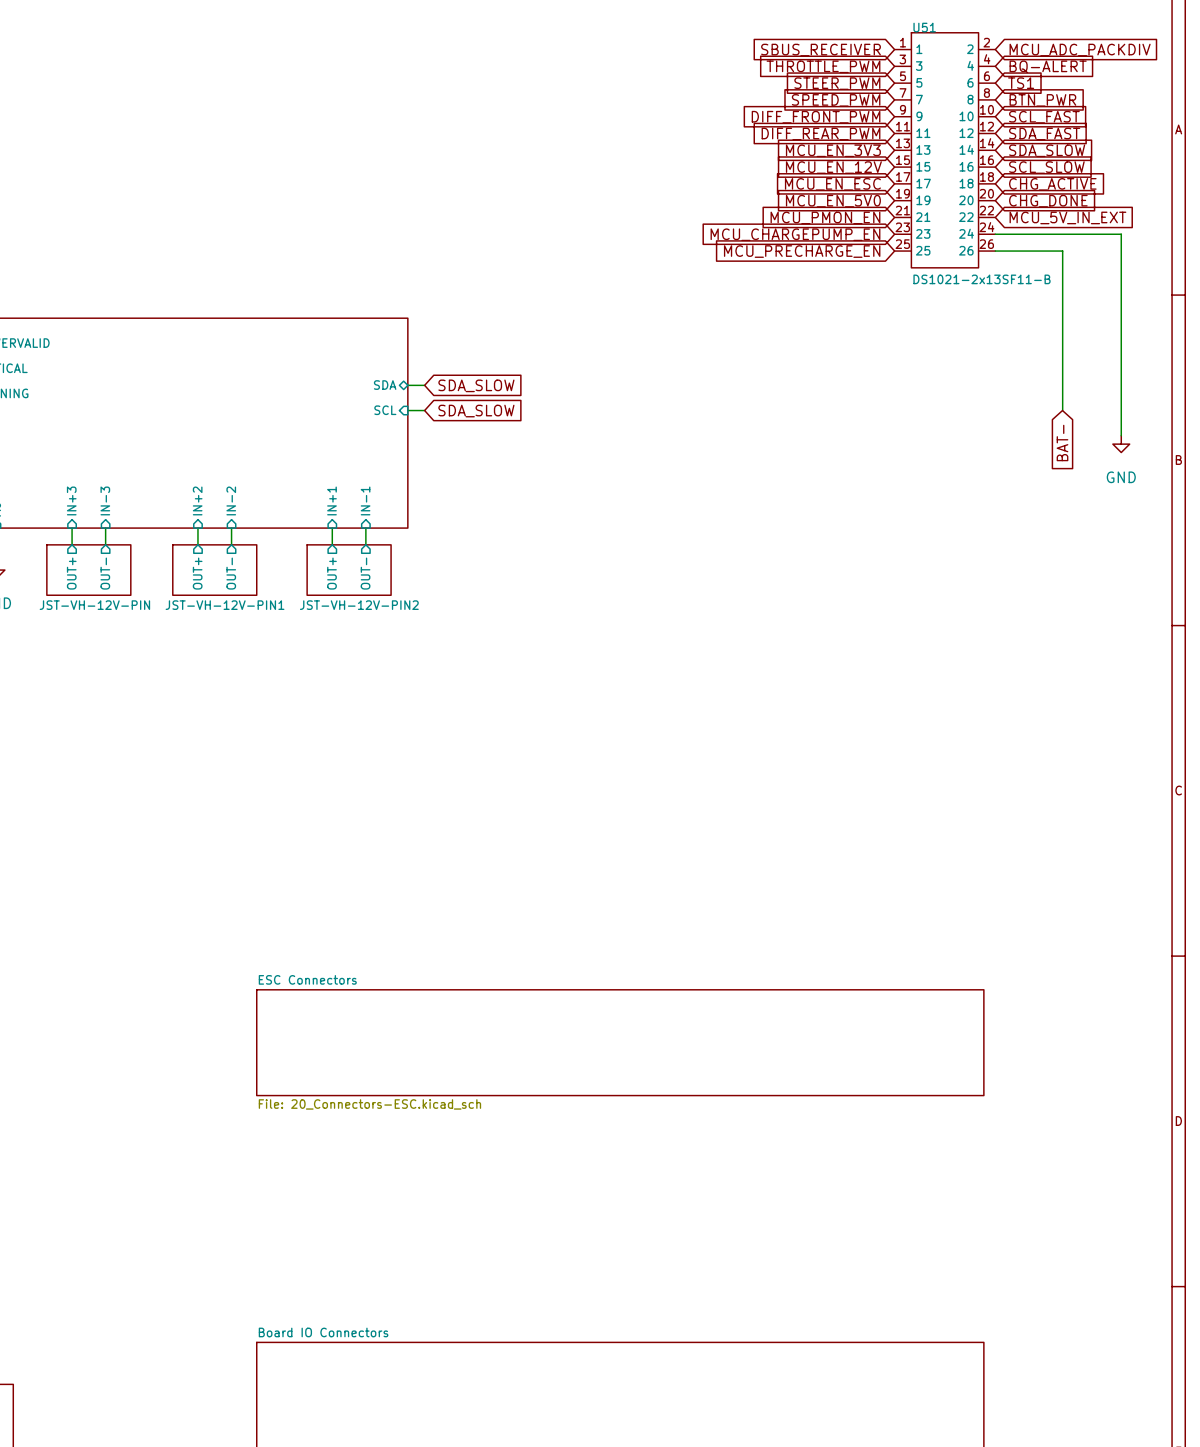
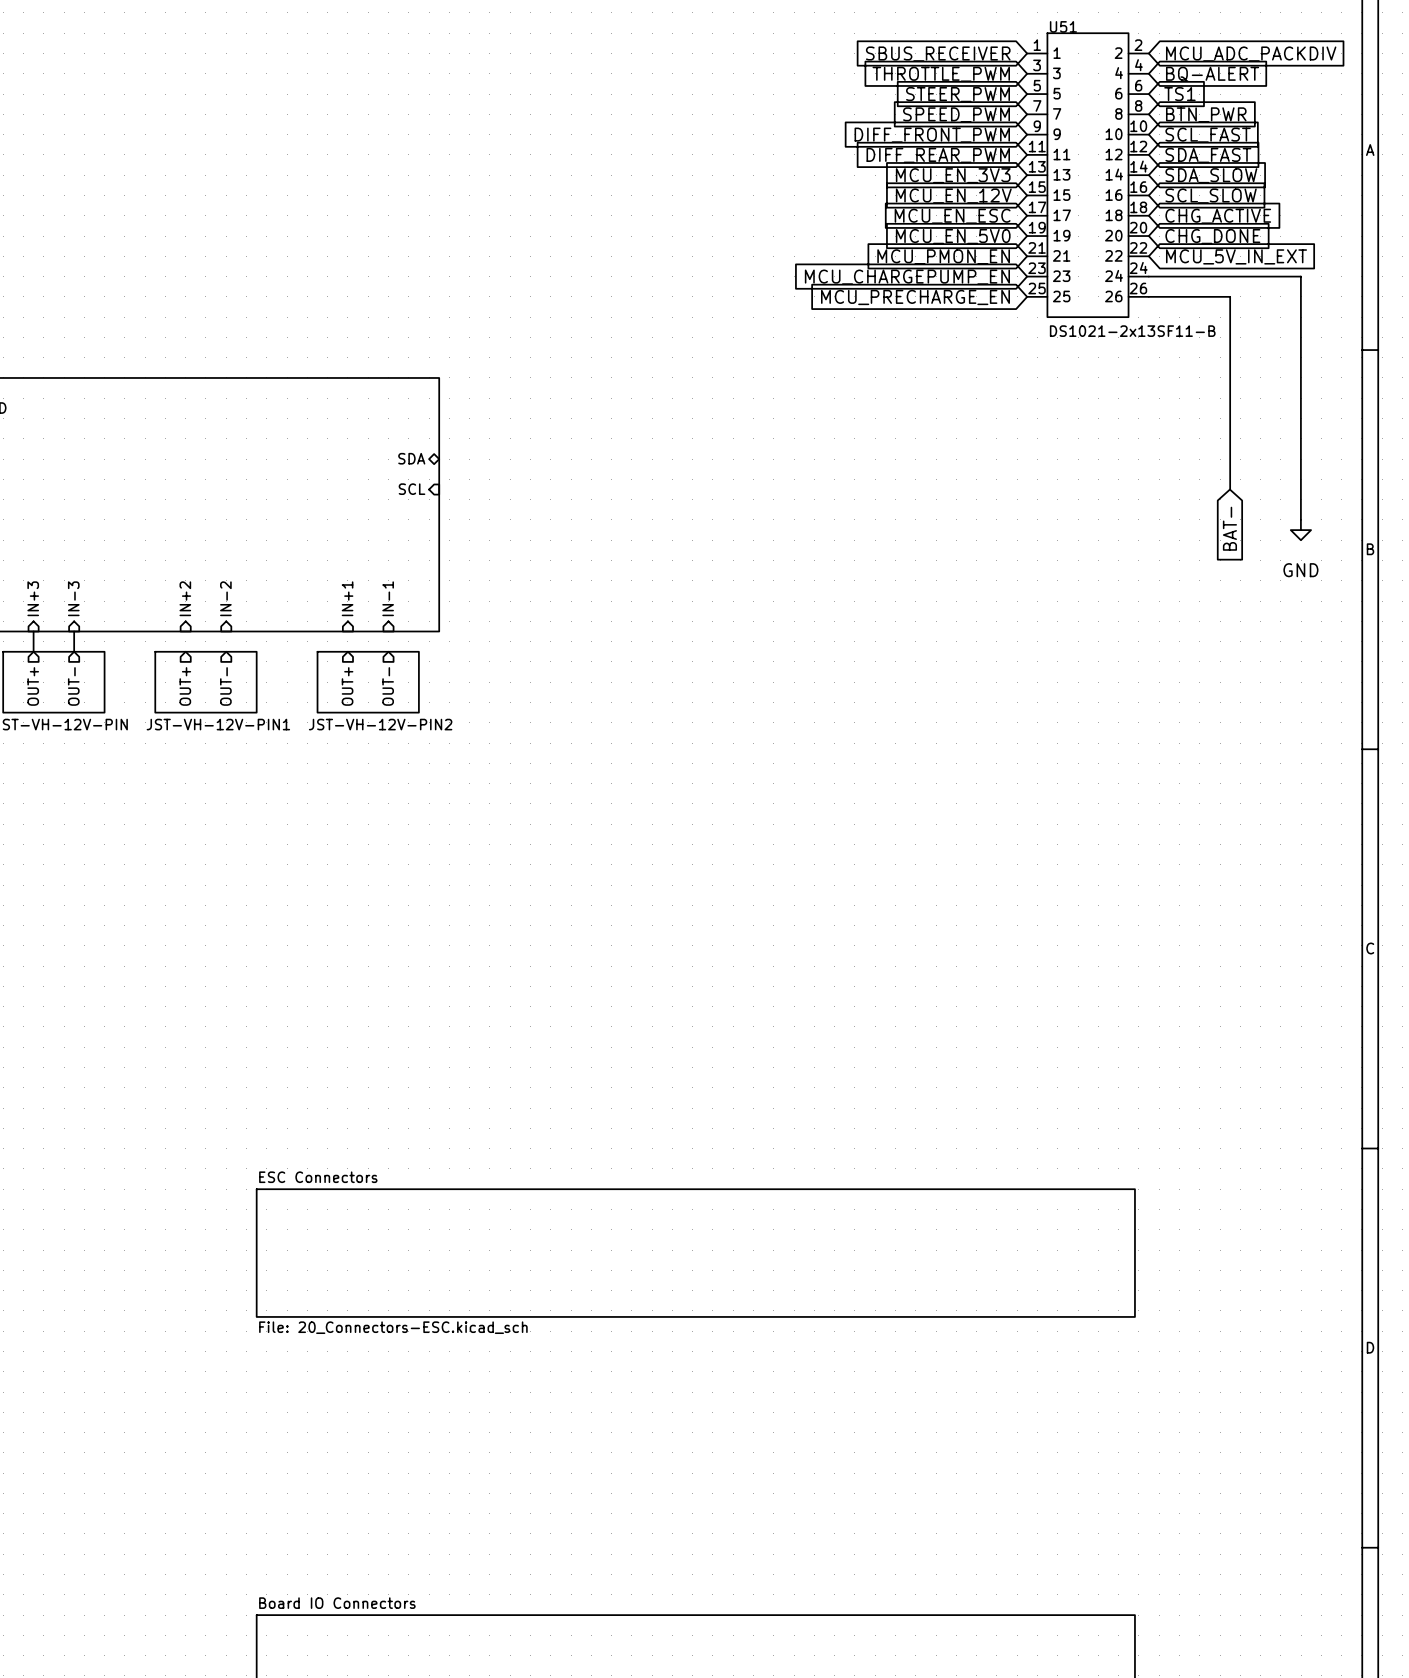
wire: (407, 385) (424, 385) -> none
global label: SDA_SLOW (476, 385) -> none
wire: (407, 410) (424, 410) -> none
global label: SDA_SLOW (476, 411) -> none
wire: (197, 528) (197, 544) -> none
wire: (231, 528) (231, 544) -> none
wire: (332, 528) (332, 544) -> none
wire: (365, 528) (365, 544) -> none

